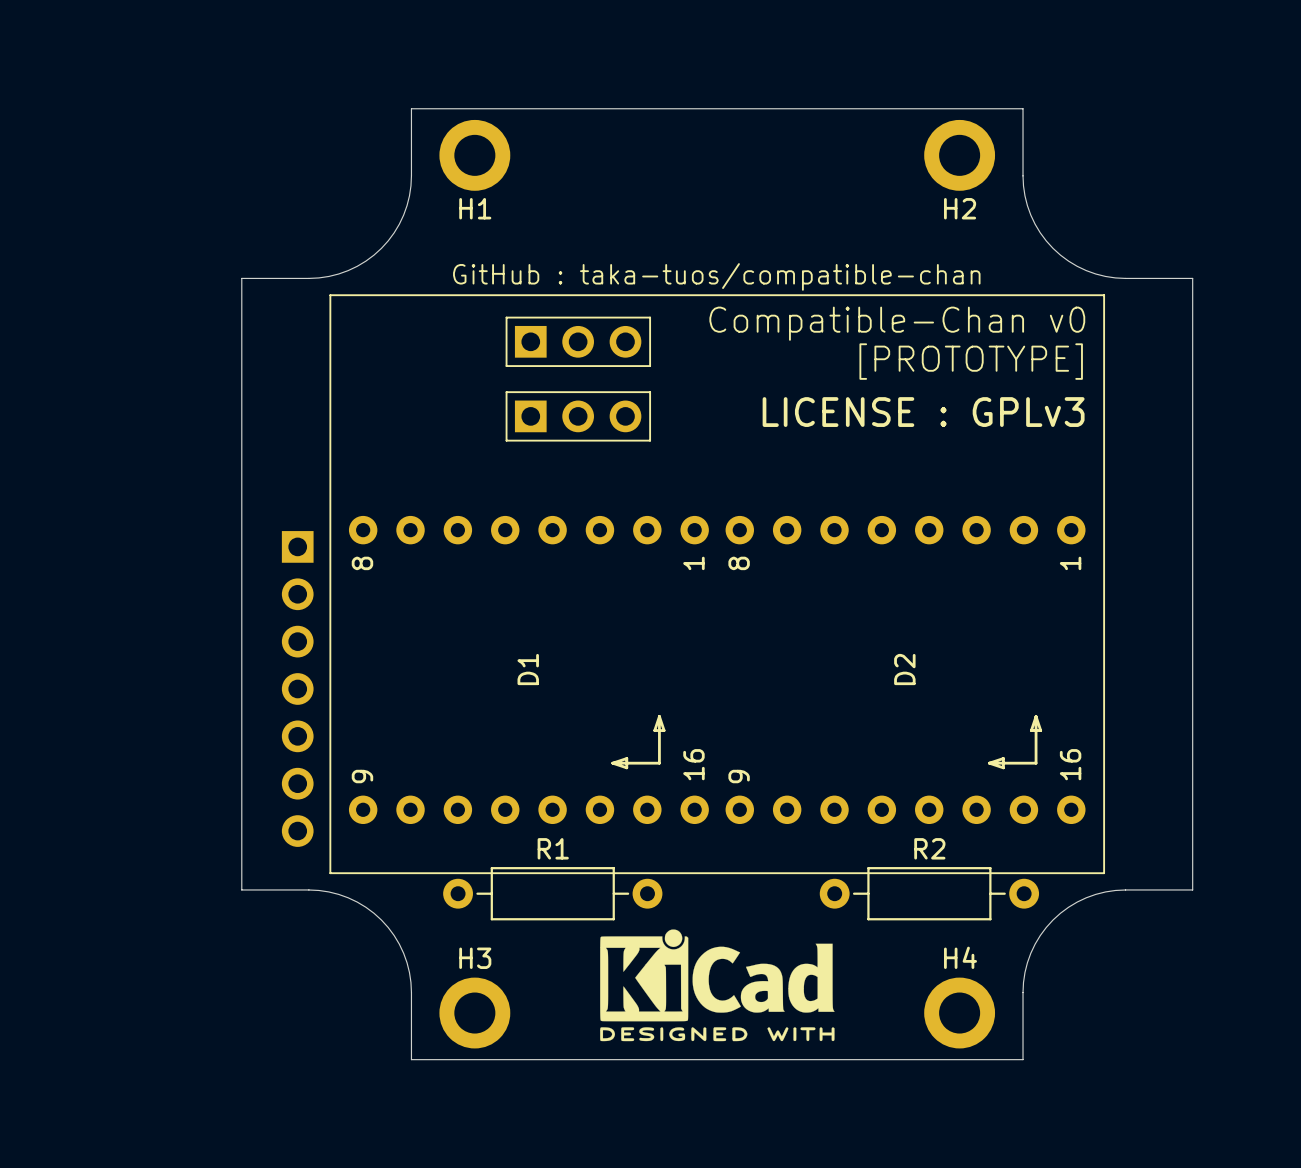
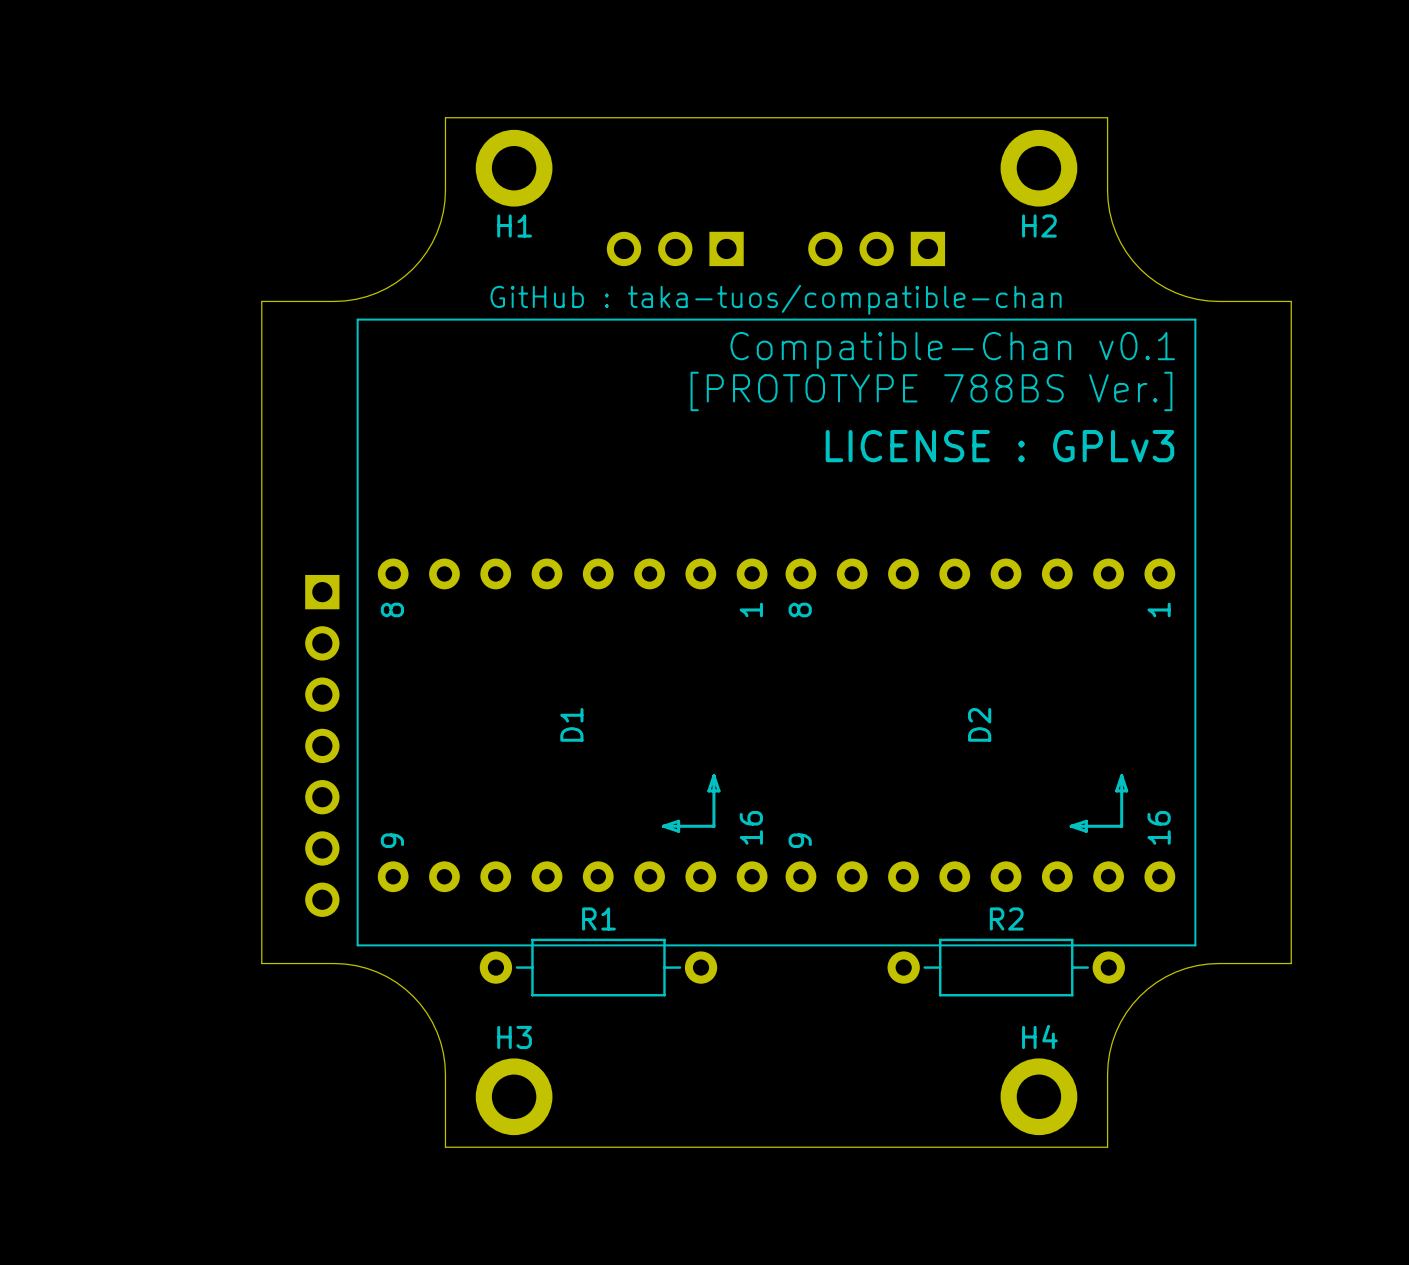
part: none -> (675, 248)
part: none -> (876, 248)
line: (506, 317) (506, 366) (650, 366) (650, 317) (506, 317) -> none
text: Compatible-Chan v0 (897, 323) -> Compatible-Chan v0.1 (952, 350)
part: (578, 341) -> none
text: [PROTOTYPE] (971, 361) -> [PROTOTYPE 788BS Ver.] (931, 391)
line: (506, 392) (650, 392) (650, 440) (506, 440) (506, 392) -> none
part: (578, 416) -> none
drawing: [600, 929, 835, 1042] -> none

